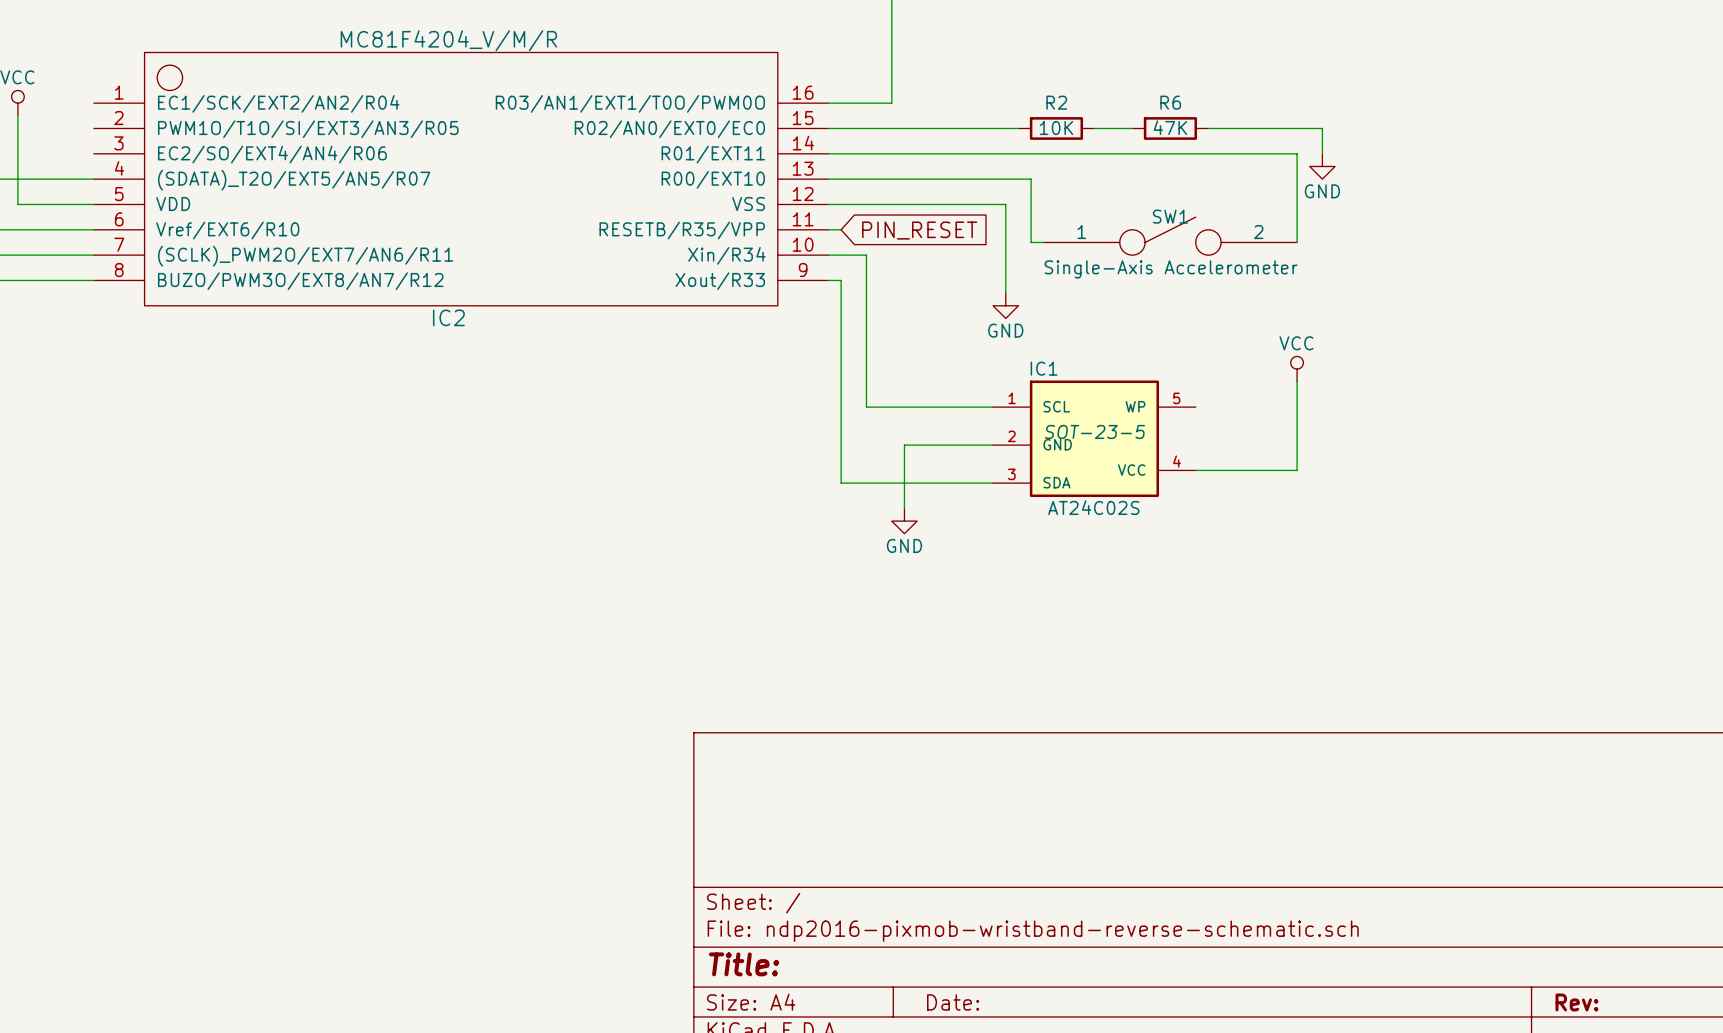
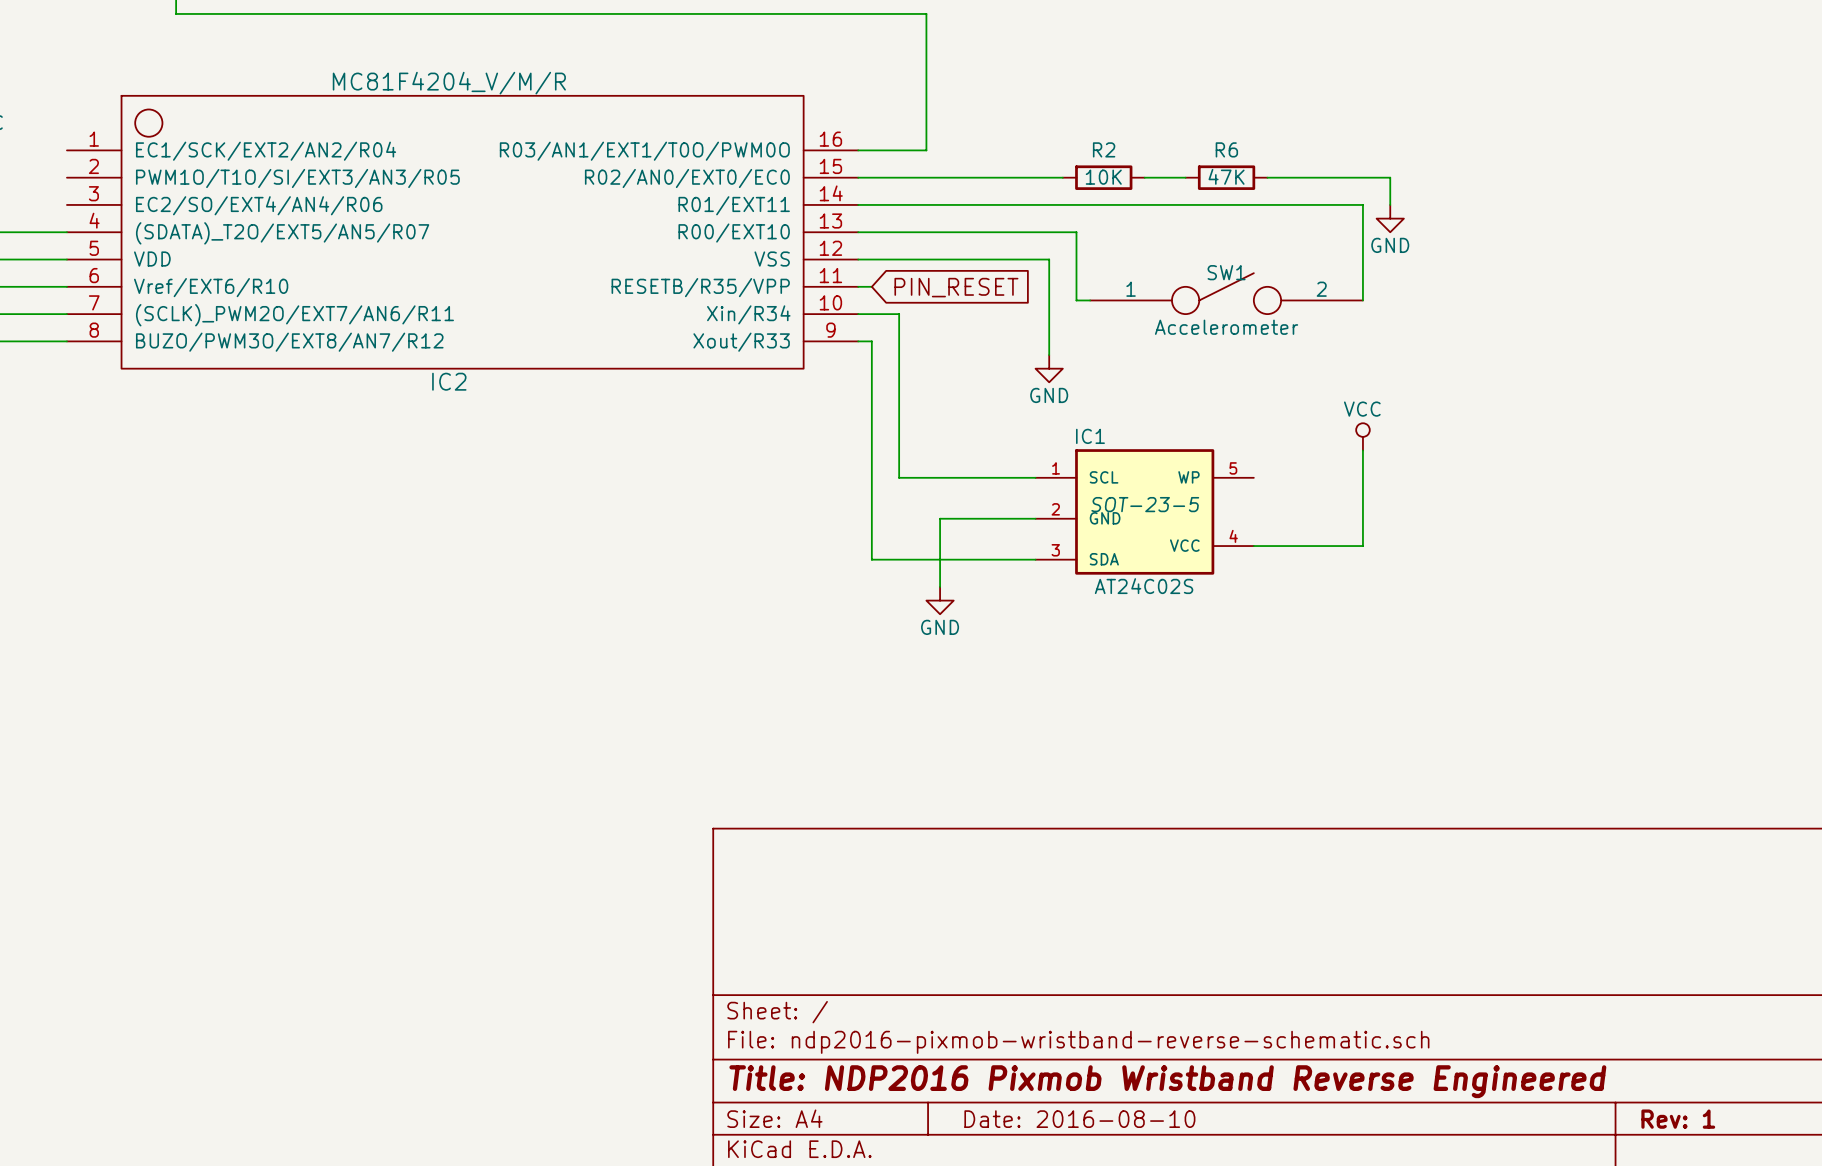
SW1 value: Single-Axis Accelerometer (1171, 269) -> Accelerometer (1226, 327)
title block: Title: (744, 964) -> Title: NDP2016 Pixmob Wristband Reverse Engineered (1167, 1081)
title block: Date: (953, 1002) -> Date: 2016-08-10 (1079, 1119)
title block: Rev: (1576, 1002) -> Rev: 1 (1678, 1119)

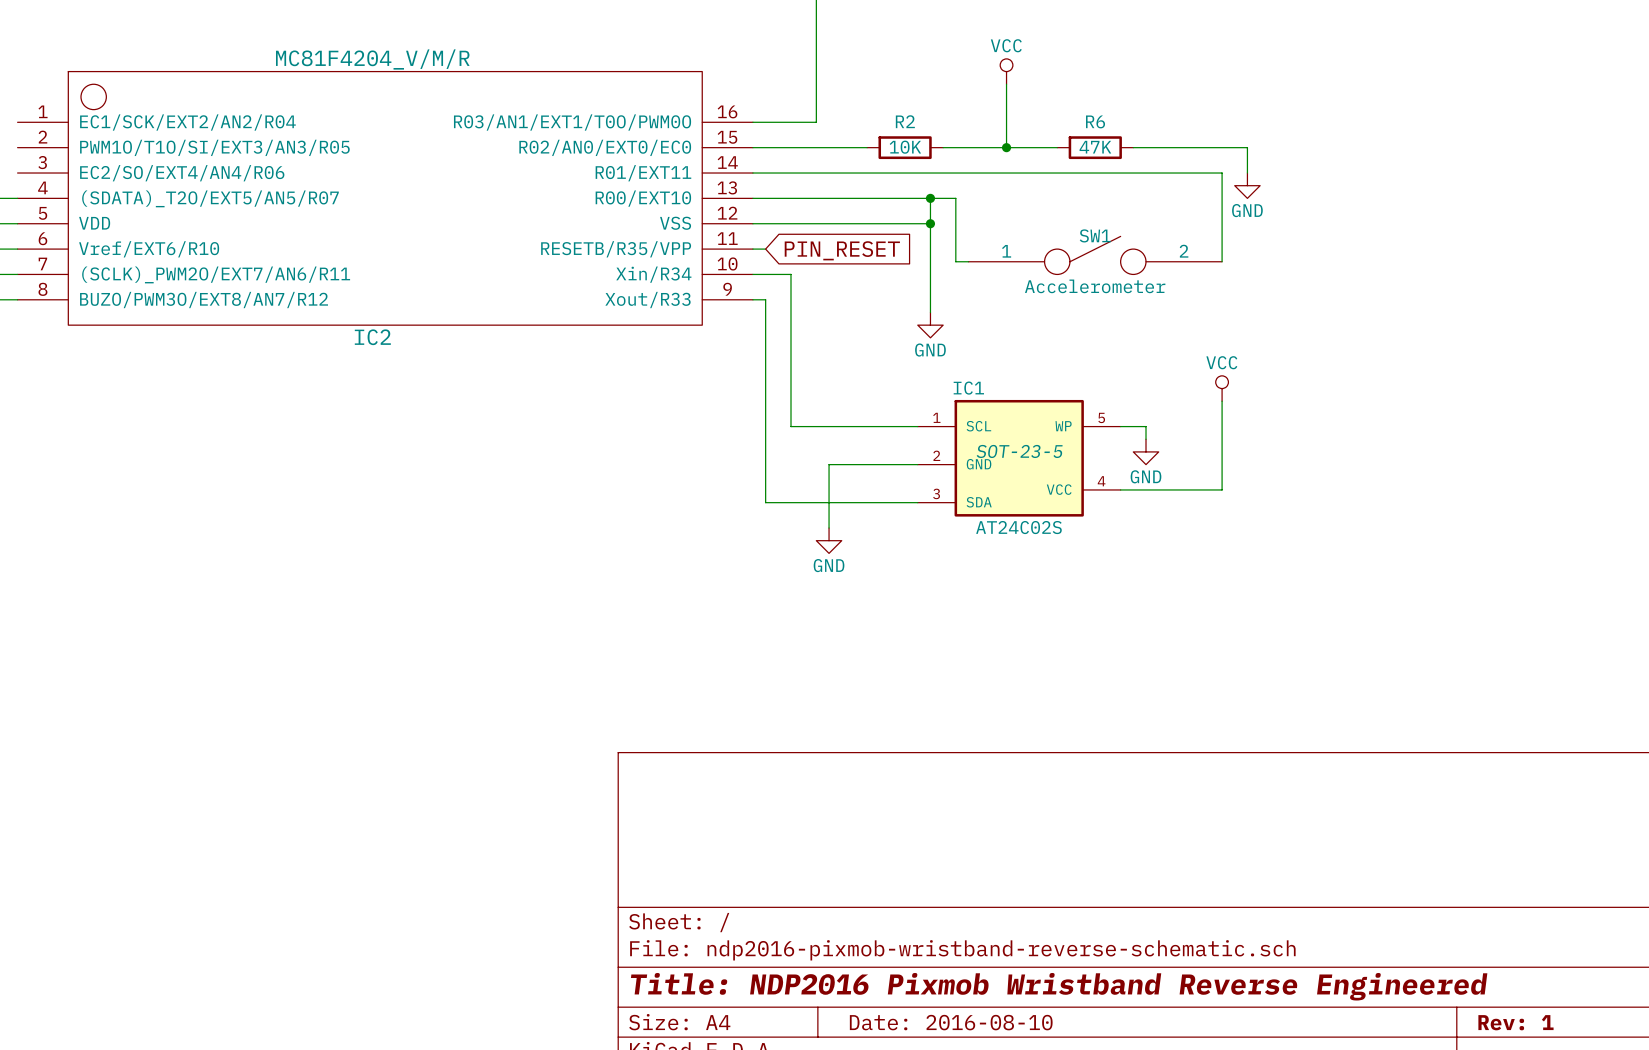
power symbol: none -> VCC (1006, 71)
wire: none -> (1006, 84) (1006, 147)
wire: (980, 177) (1062, 177) -> (1019, 147) (943, 147)
R2 position: (1103, 177) -> (905, 147)
junction: none -> (1006, 147)
wire: none -> (930, 198) (930, 223)
junction: none -> (930, 198)
junction: none -> (930, 223)
wire: none -> (1120, 426) (1146, 426) (1146, 439)
power symbol: none -> GND (1146, 451)

